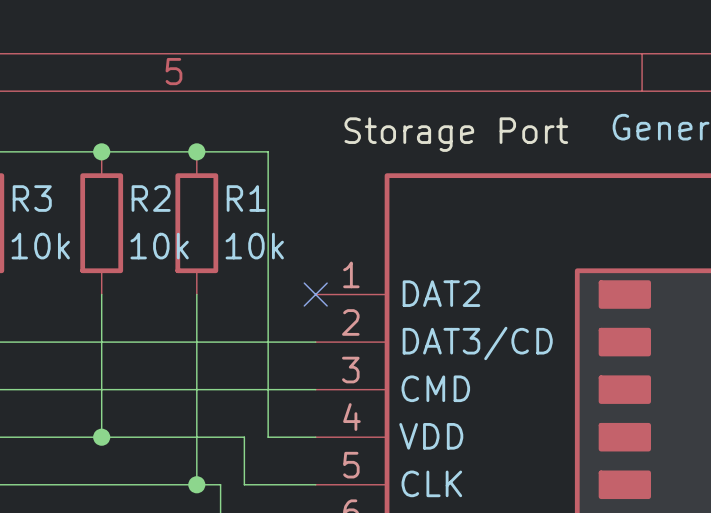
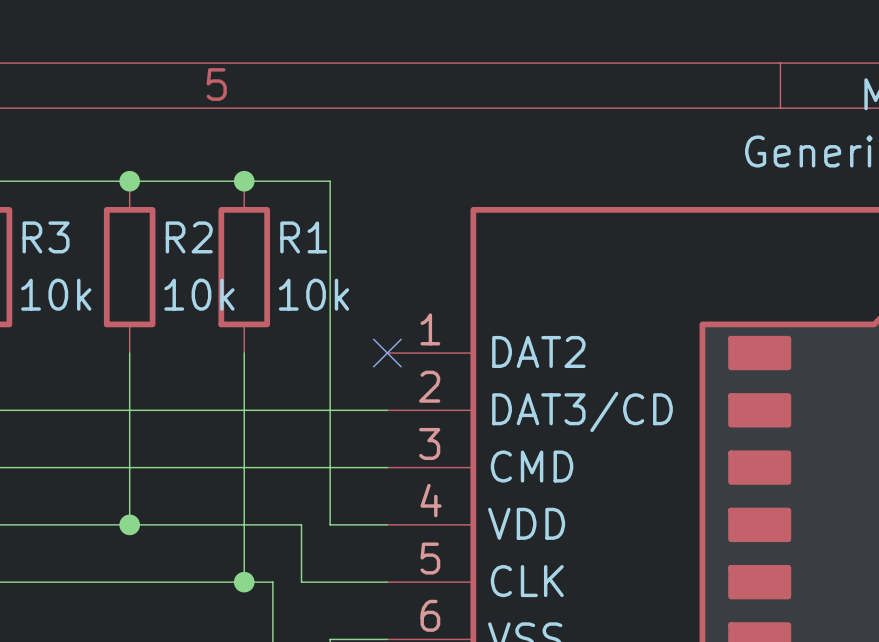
label: Storage Port (456, 134) -> none

